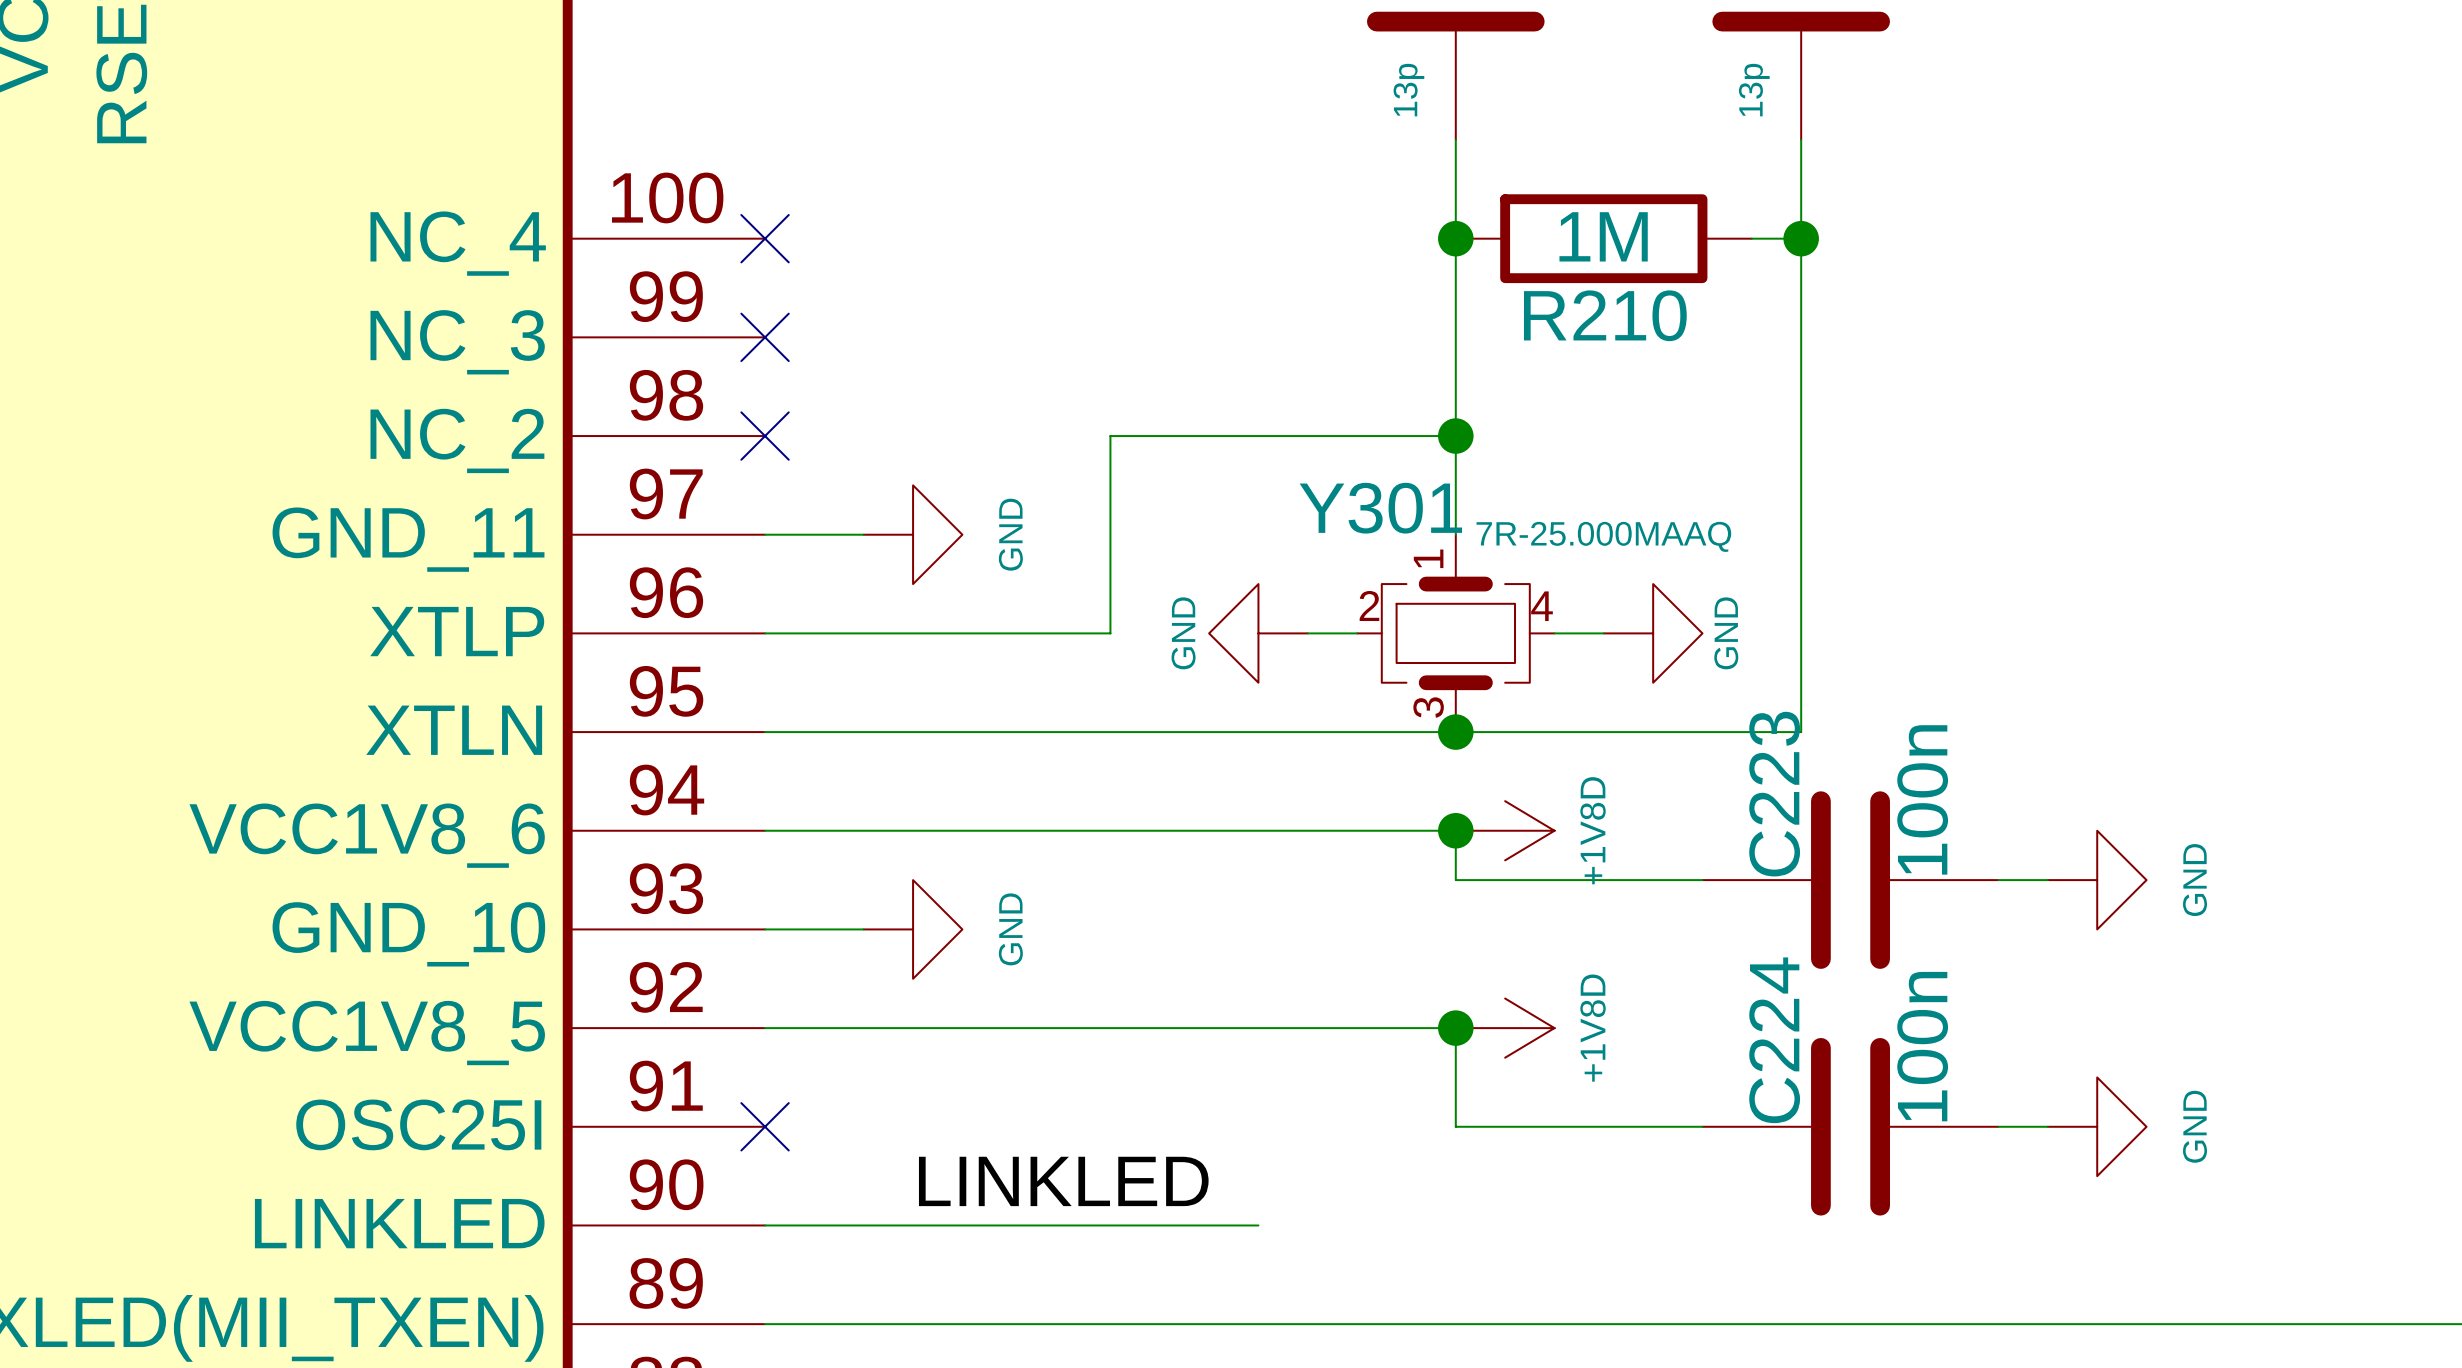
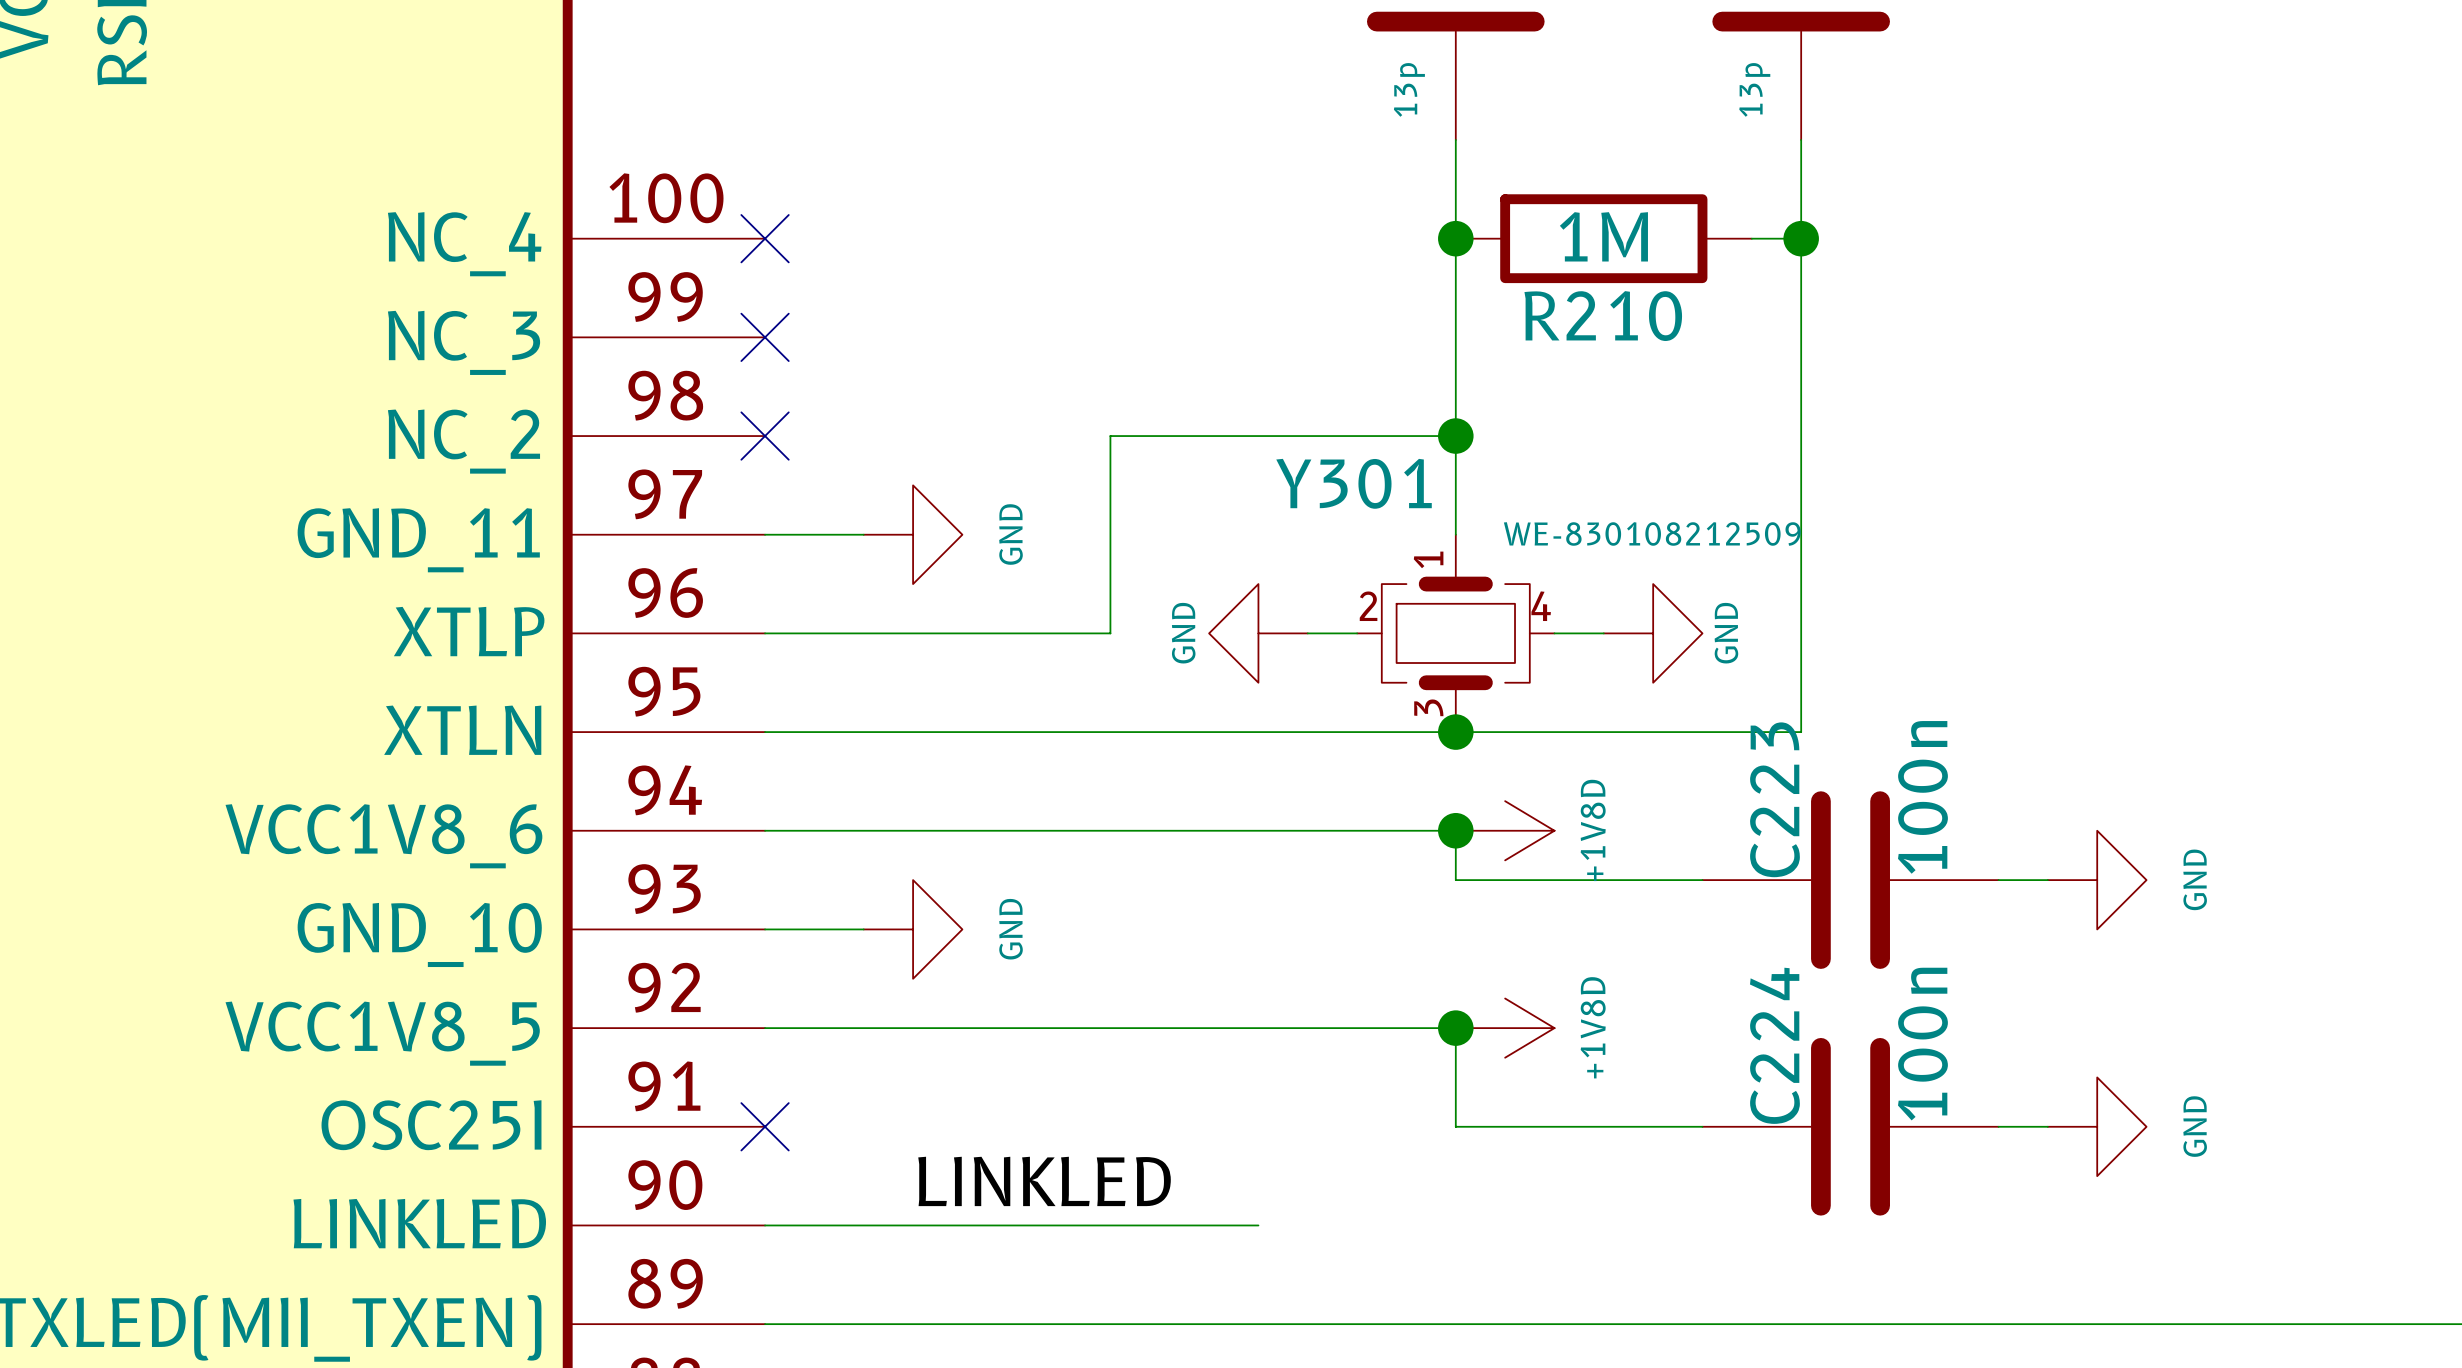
Y301 name position: Y301 (1380, 508) -> Y301 (1354, 483)
Y301 value: 7R-25.000MAAQ (1603, 536) -> WE-830108212509 (1652, 533)

